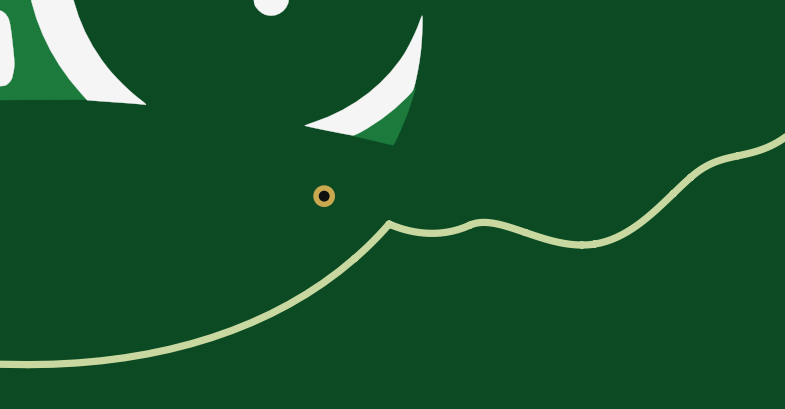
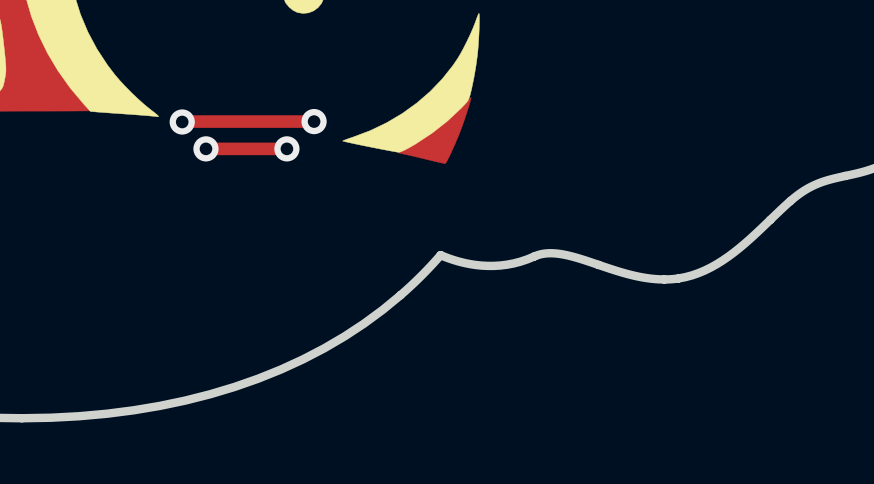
track: none -> (182, 121) (314, 121)
via: none -> (314, 121)
via: none -> (182, 121)
track: none -> (205, 148) (286, 148)
via: none -> (205, 148)
via: none -> (286, 148)
via: (324, 196) -> none

